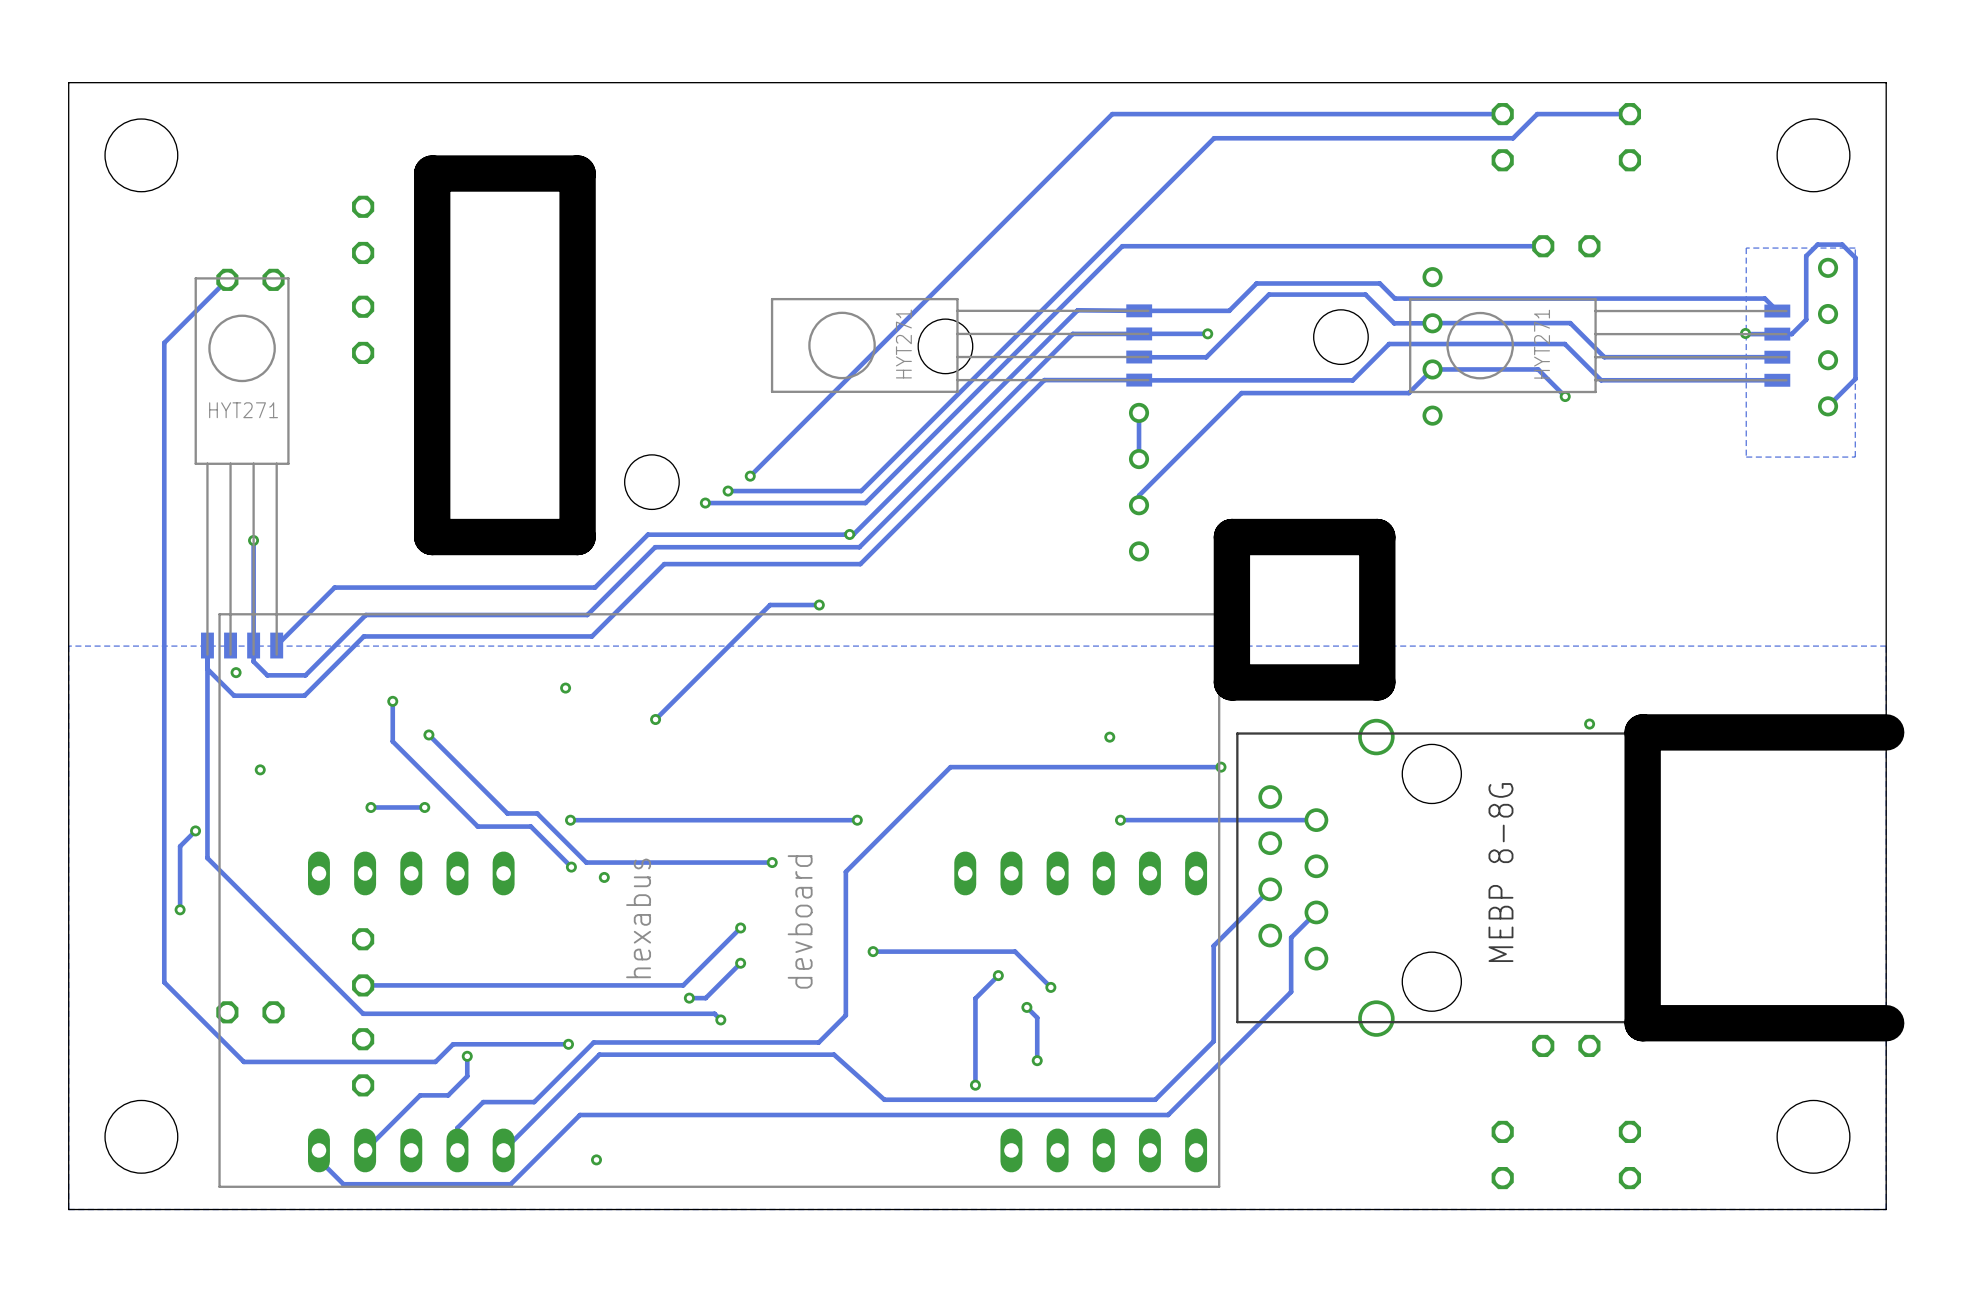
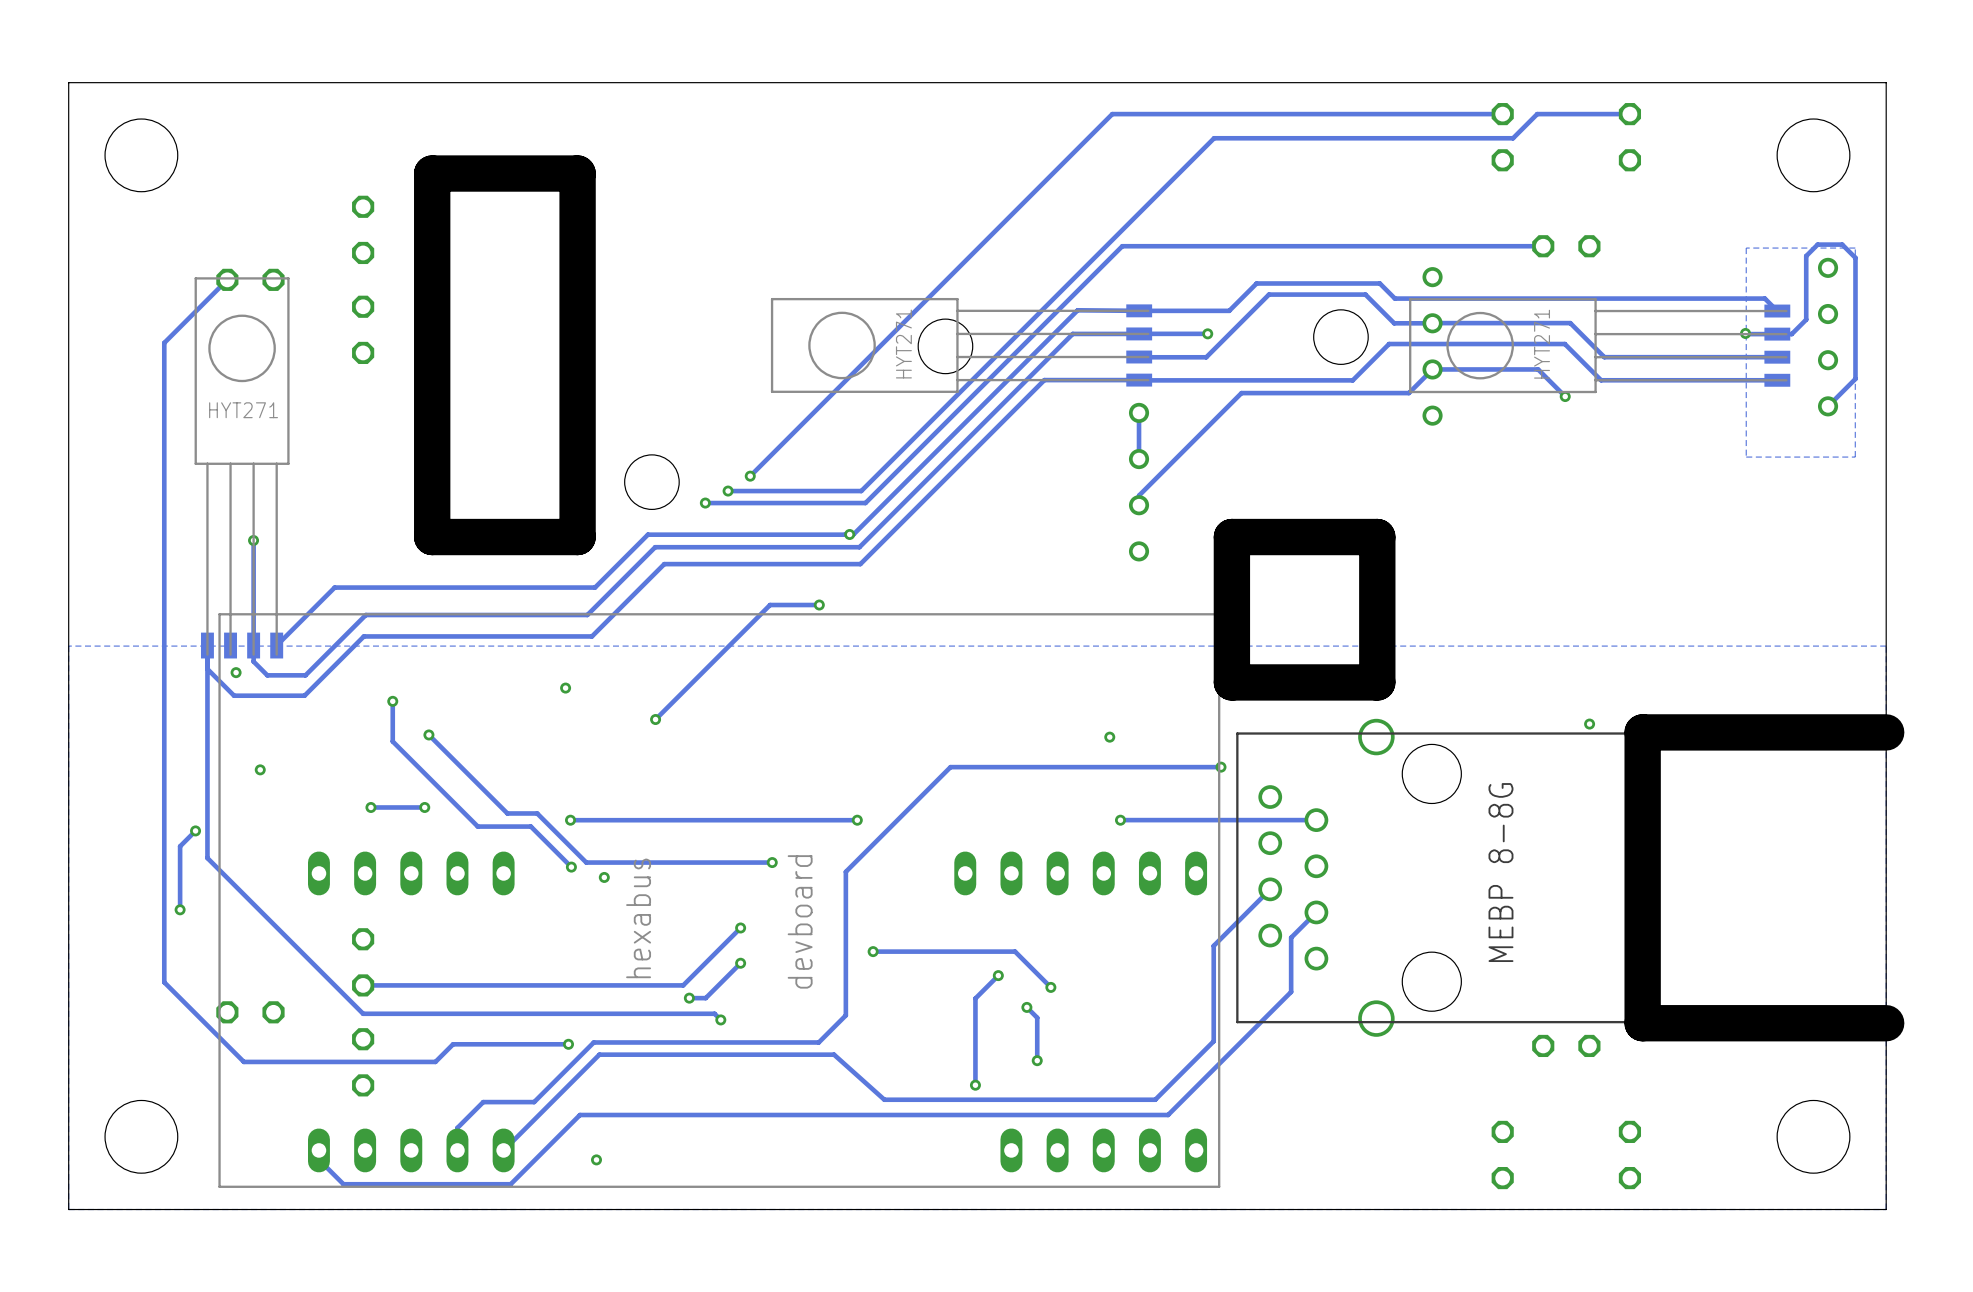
track: (467, 1056) (467, 1076) (448, 1095) (420, 1095) (365, 1150) -> none
via: (467, 1056) -> none

